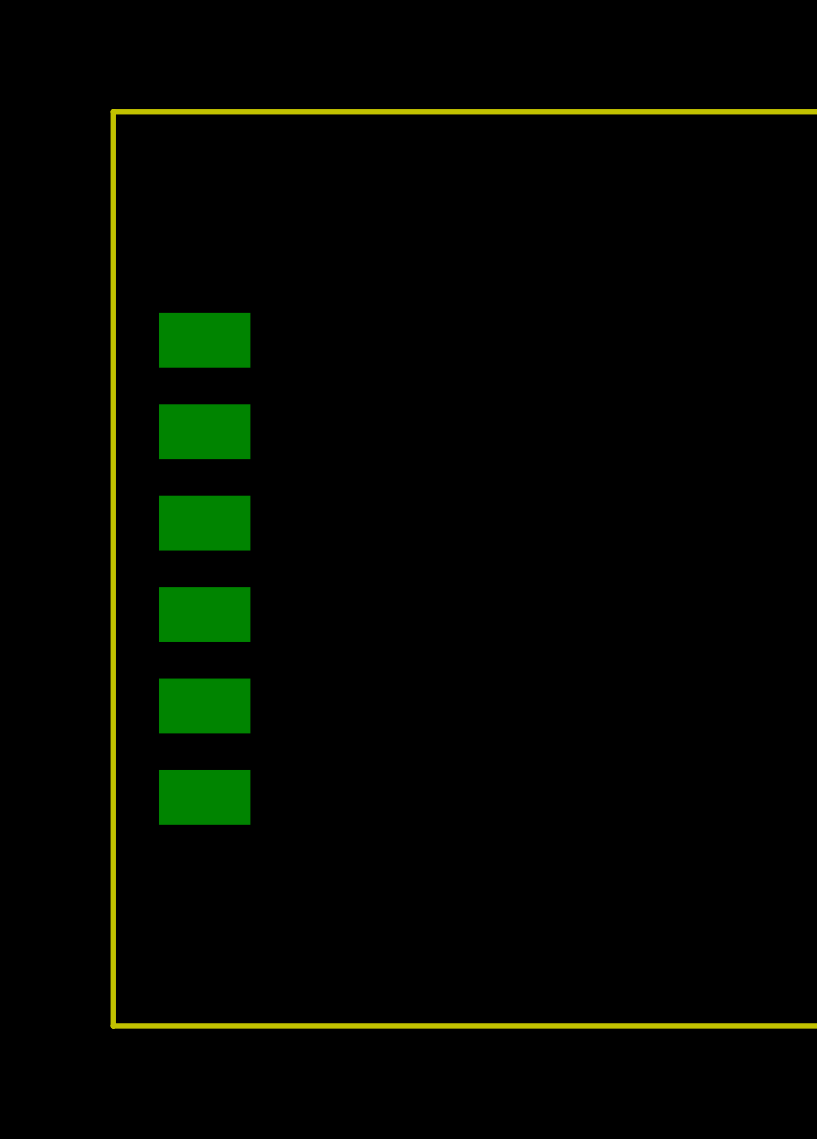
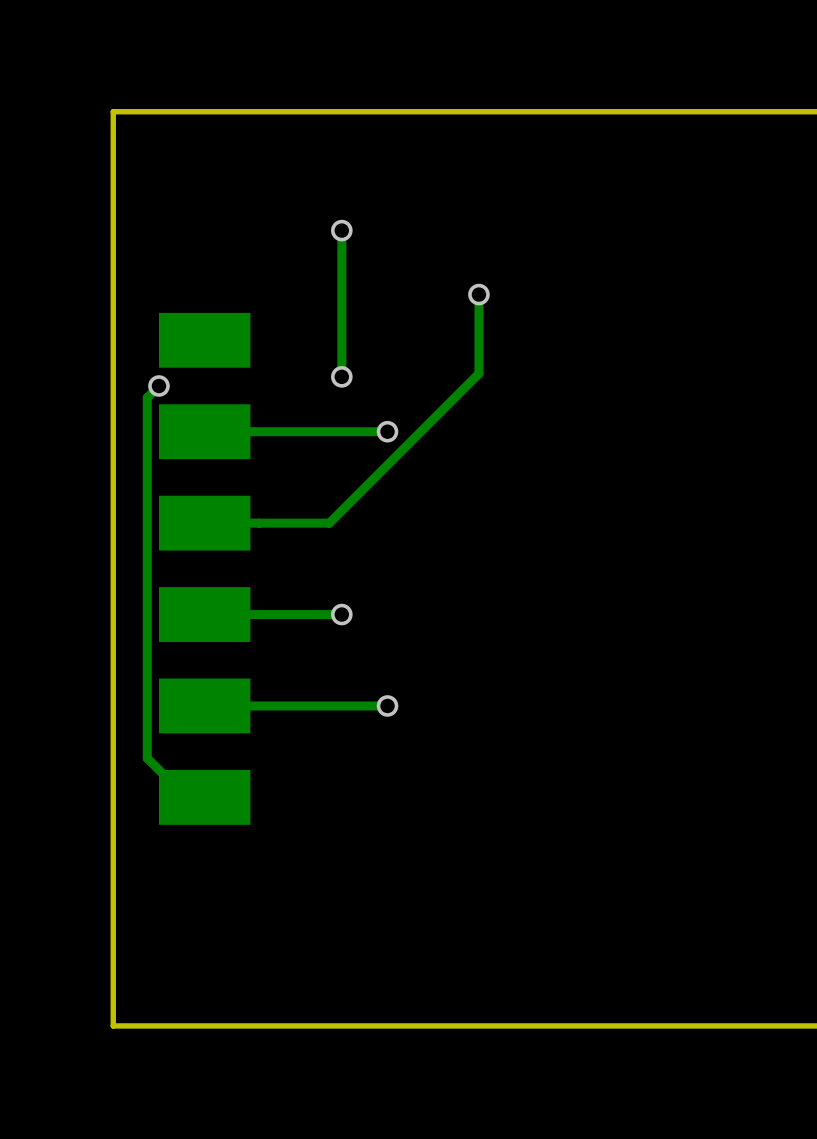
track: none -> (341, 230) (341, 376)
via: none -> (341, 230)
track: none -> (478, 294) (478, 373) (329, 523) (204, 523)
via: none -> (478, 294)
via: none -> (341, 376)
track: none -> (158, 386) (147, 397) (147, 758) (186, 797) (204, 797)
via: none -> (158, 386)
track: none -> (387, 431) (204, 431)
via: none -> (387, 431)
track: none -> (341, 614) (204, 614)
via: none -> (341, 614)
track: none -> (387, 705) (204, 705)
via: none -> (387, 705)

